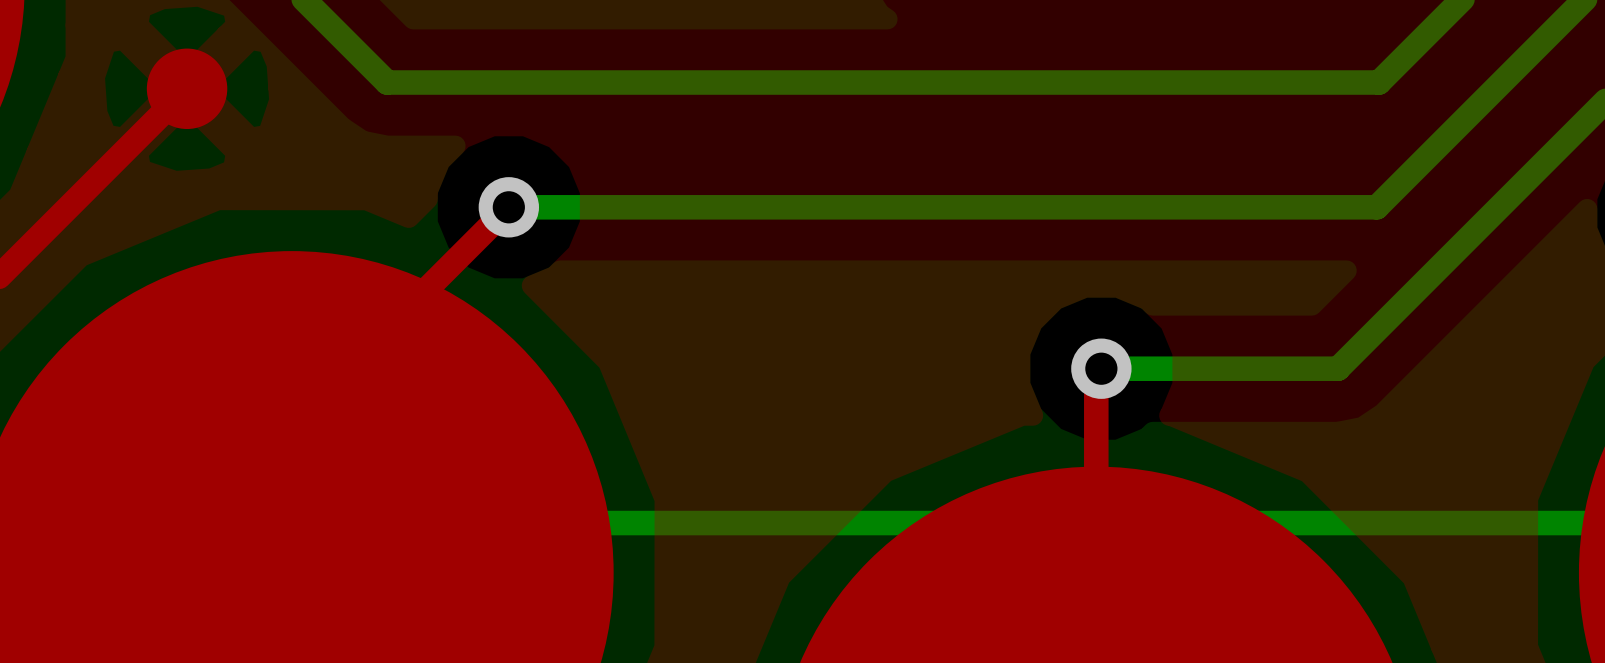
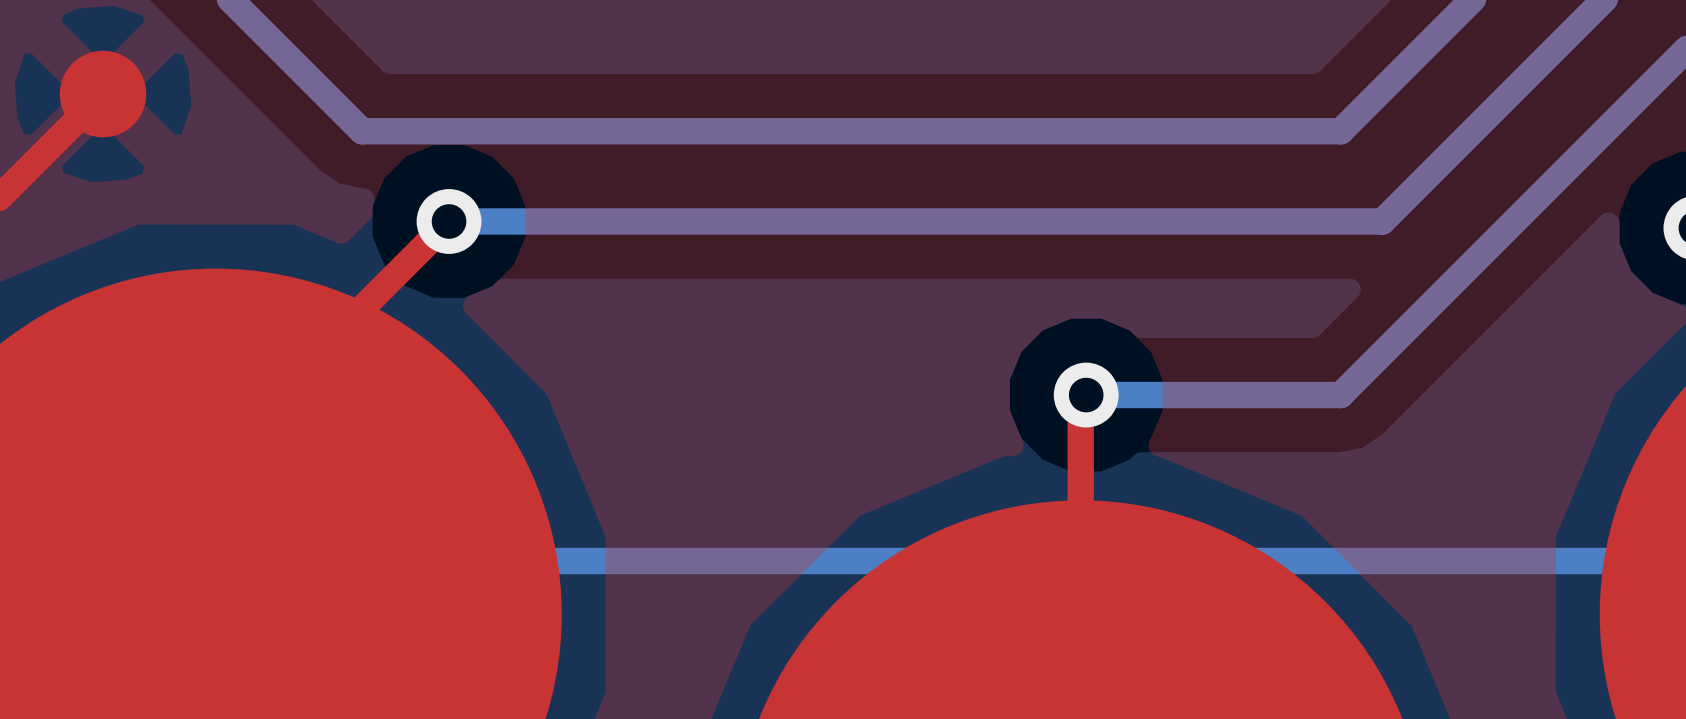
bottom track: (387, 82) (1379, 82) -> (318, 87) (362, 131) (1340, 131) (1384, 87)

